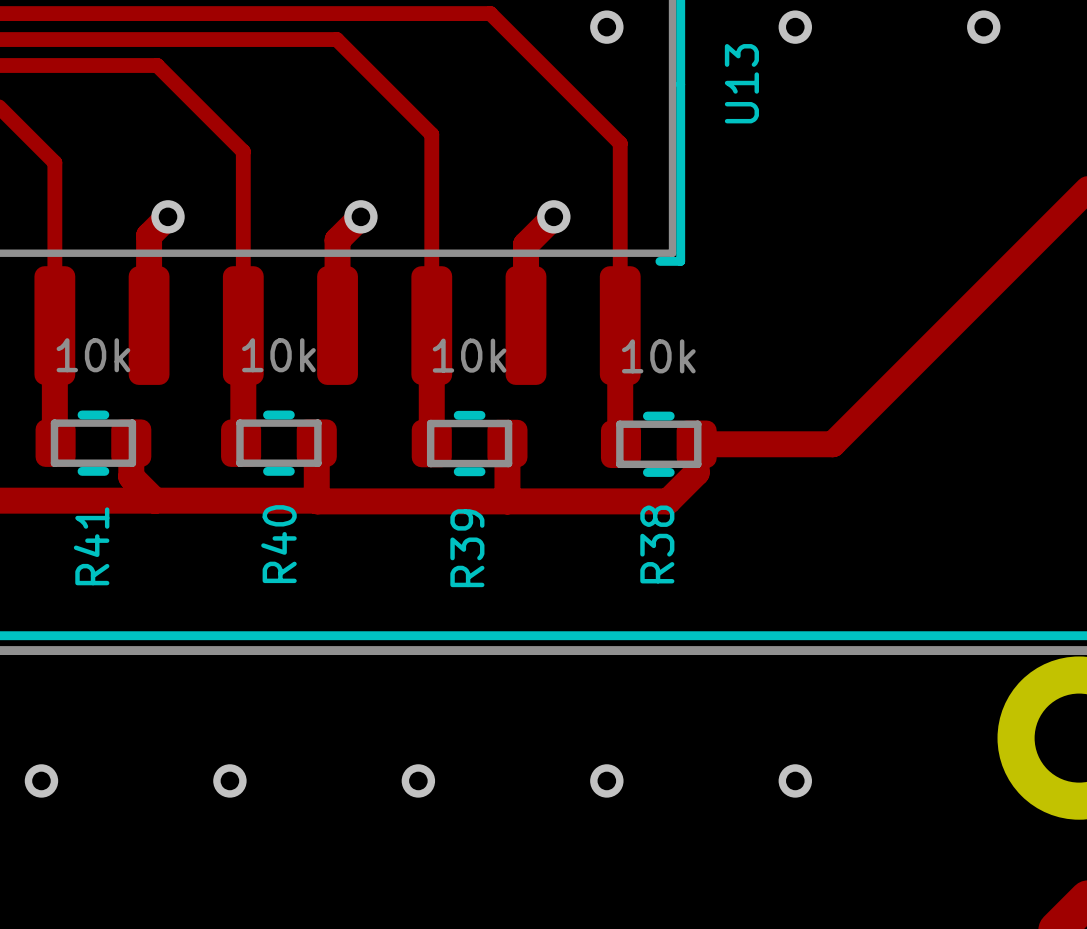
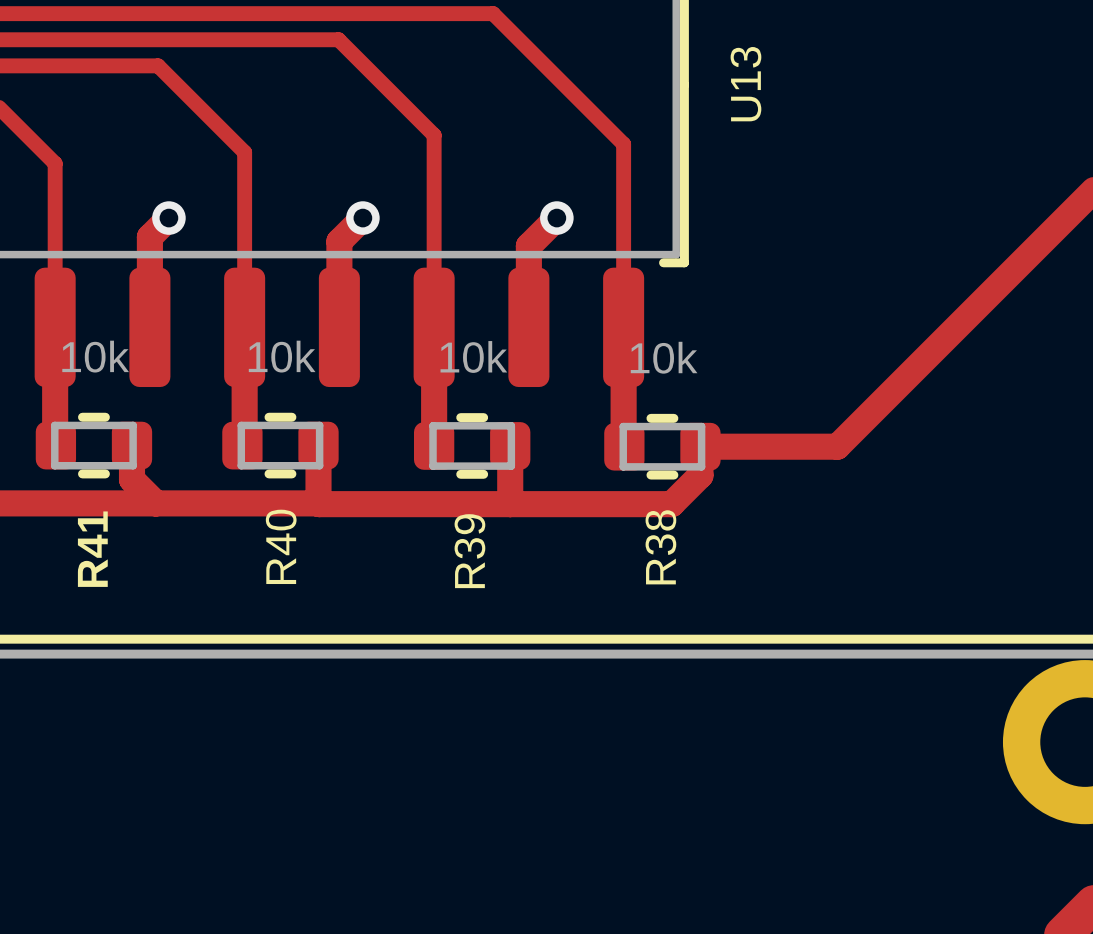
via: (606, 27) -> none
via: (795, 27) -> none
via: (983, 27) -> none
via: (41, 780) -> none
via: (229, 780) -> none
via: (418, 780) -> none
via: (606, 780) -> none
via: (795, 780) -> none

